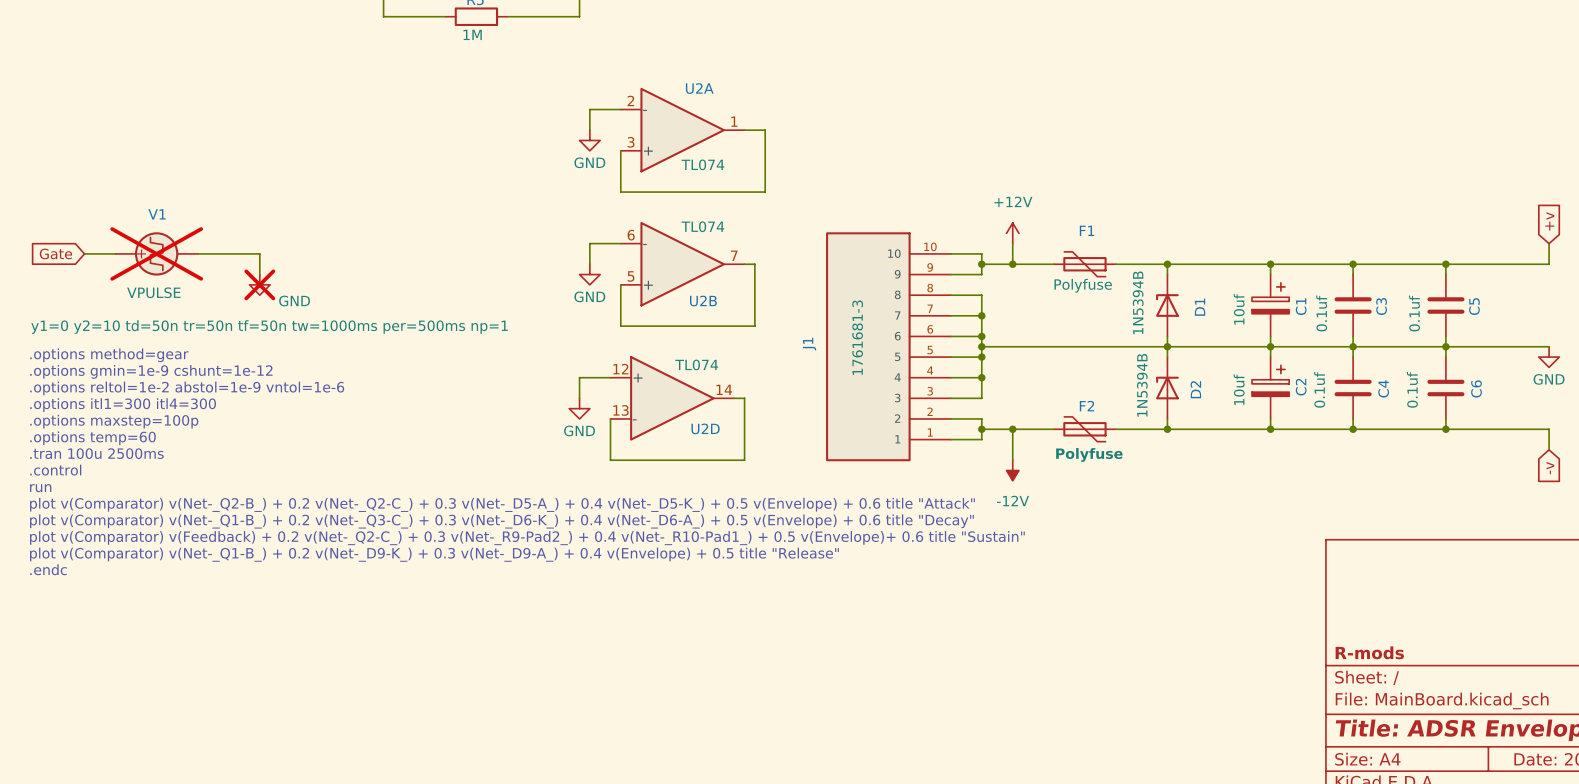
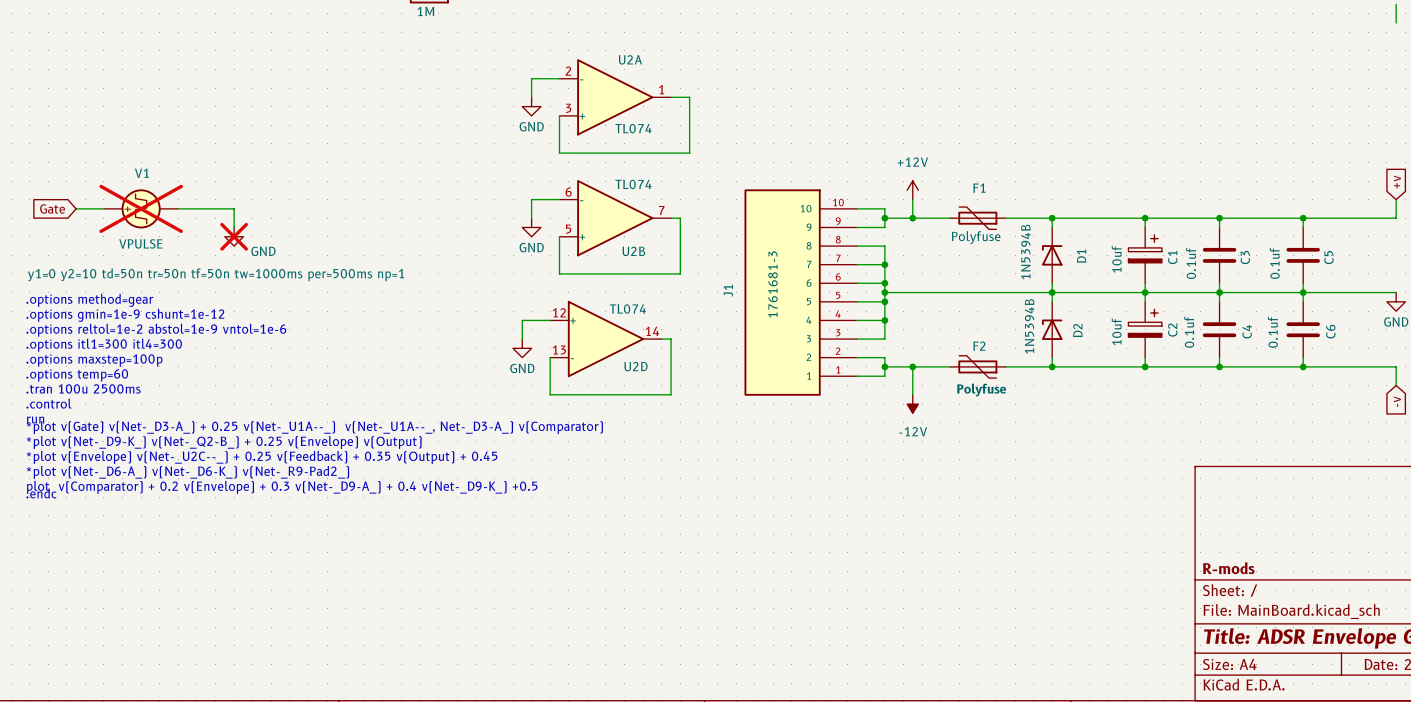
wire: none -> (1396, 4) (1396, 22)
text: none -> *plot v(Gate) v(Net-_D3-A_) + 0.25 v(Net-_U1A--_) v(Net-_U1A--_, Net-_D3-A_) v(Comparator) (314, 427)
text: plot v(Comparator) v(Net-_Q2-B_) + 0.2 v(Net-_Q2-C_) + 0.3 v(Net-_D5-A_) + 0.4 v(Net-_D5-K_) + 0.5 v(Envelope) + 0.6 title "Attack" (502, 504) -> none
text: none -> *plot v(Net-_D9-K_) v(Net-_Q2-B_) + 0.25 v(Envelope) v(Output) (224, 442)
text: plot v(Comparator) v(Net-_Q1-B_) + 0.2 v(Net-_Q3-C_) + 0.3 v(Net-_D6-K_) + 0.4 v(Net-_D6-A_) + 0.5 v(Envelope) + 0.6 title "Decay" (501, 521) -> none
text: none -> *plot v(Envelope) v(Net-_U2C--_) + 0.25 v(Feedback) + 0.35 v(Output) + 0.45 (262, 457)
text: plot v(Comparator) v(Feedback) + 0.2 v(Net-_Q2-C_) + 0.3 v(Net-_R9-Pad2_) + 0.4 v(Net-_R10-Pad1_) + 0.5 v(Envelope)+ 0.6 title "Sustain" (527, 538) -> none
text: none -> *plot v(Net-_D6-A_) v(Net-_D6-K_) v(Net-_R9-Pad2_) (187, 472)
text: plot v(Comparator) v(Net-_Q1-B_) + 0.2 v(Net-_D9-K_) + 0.3 v(Net-_D9-A_) + 0.4 v(Envelope) + 0.5 title "Release" (434, 554) -> plot v(Comparator) + 0.2 v(Envelope) + 0.3 v(Net-_D9-A_) + 0.4 v(Net-_D9-K_) +0.5 (282, 487)

